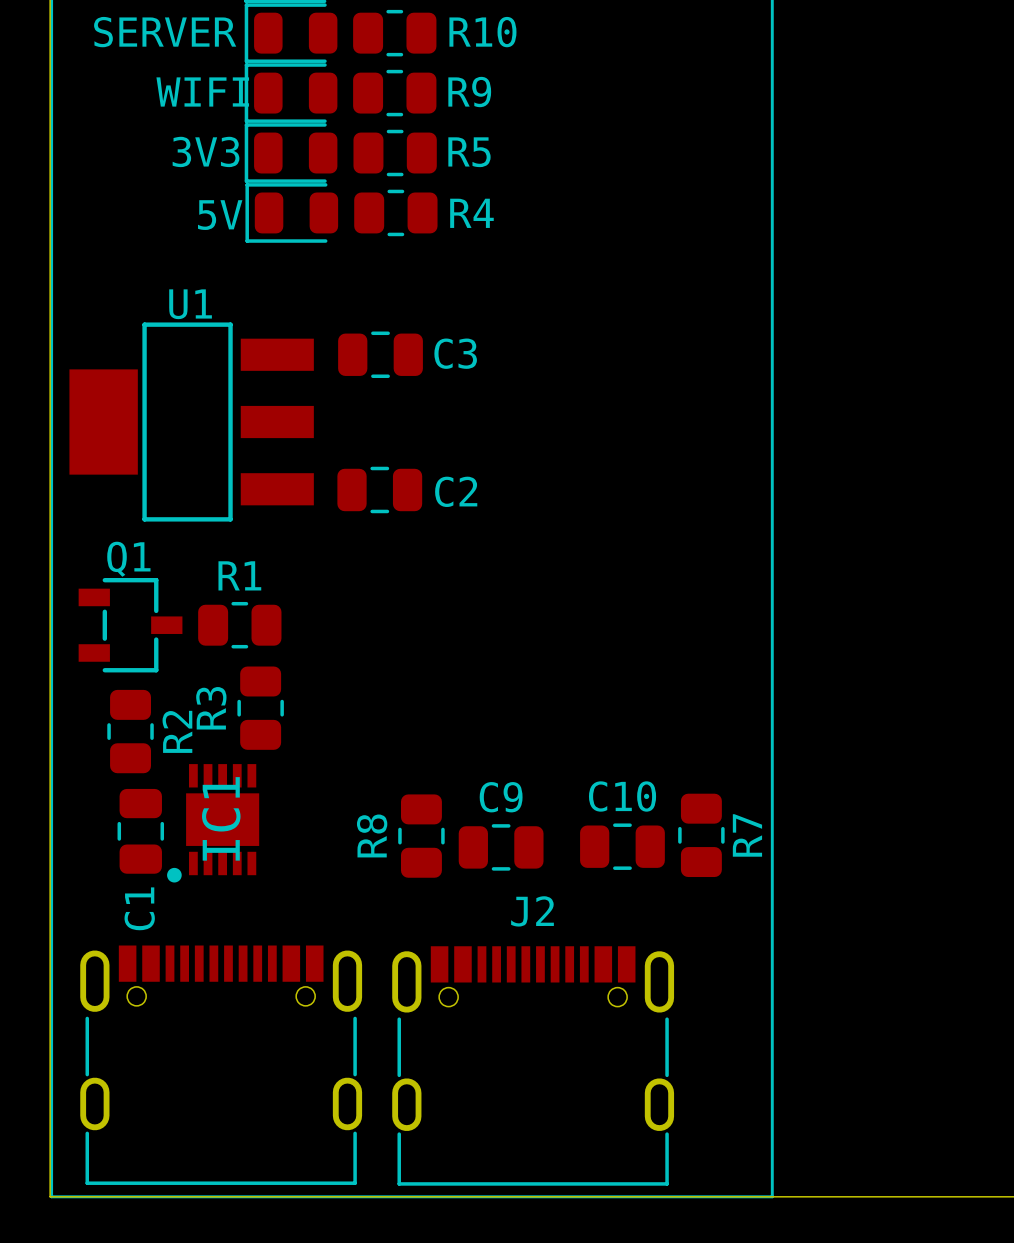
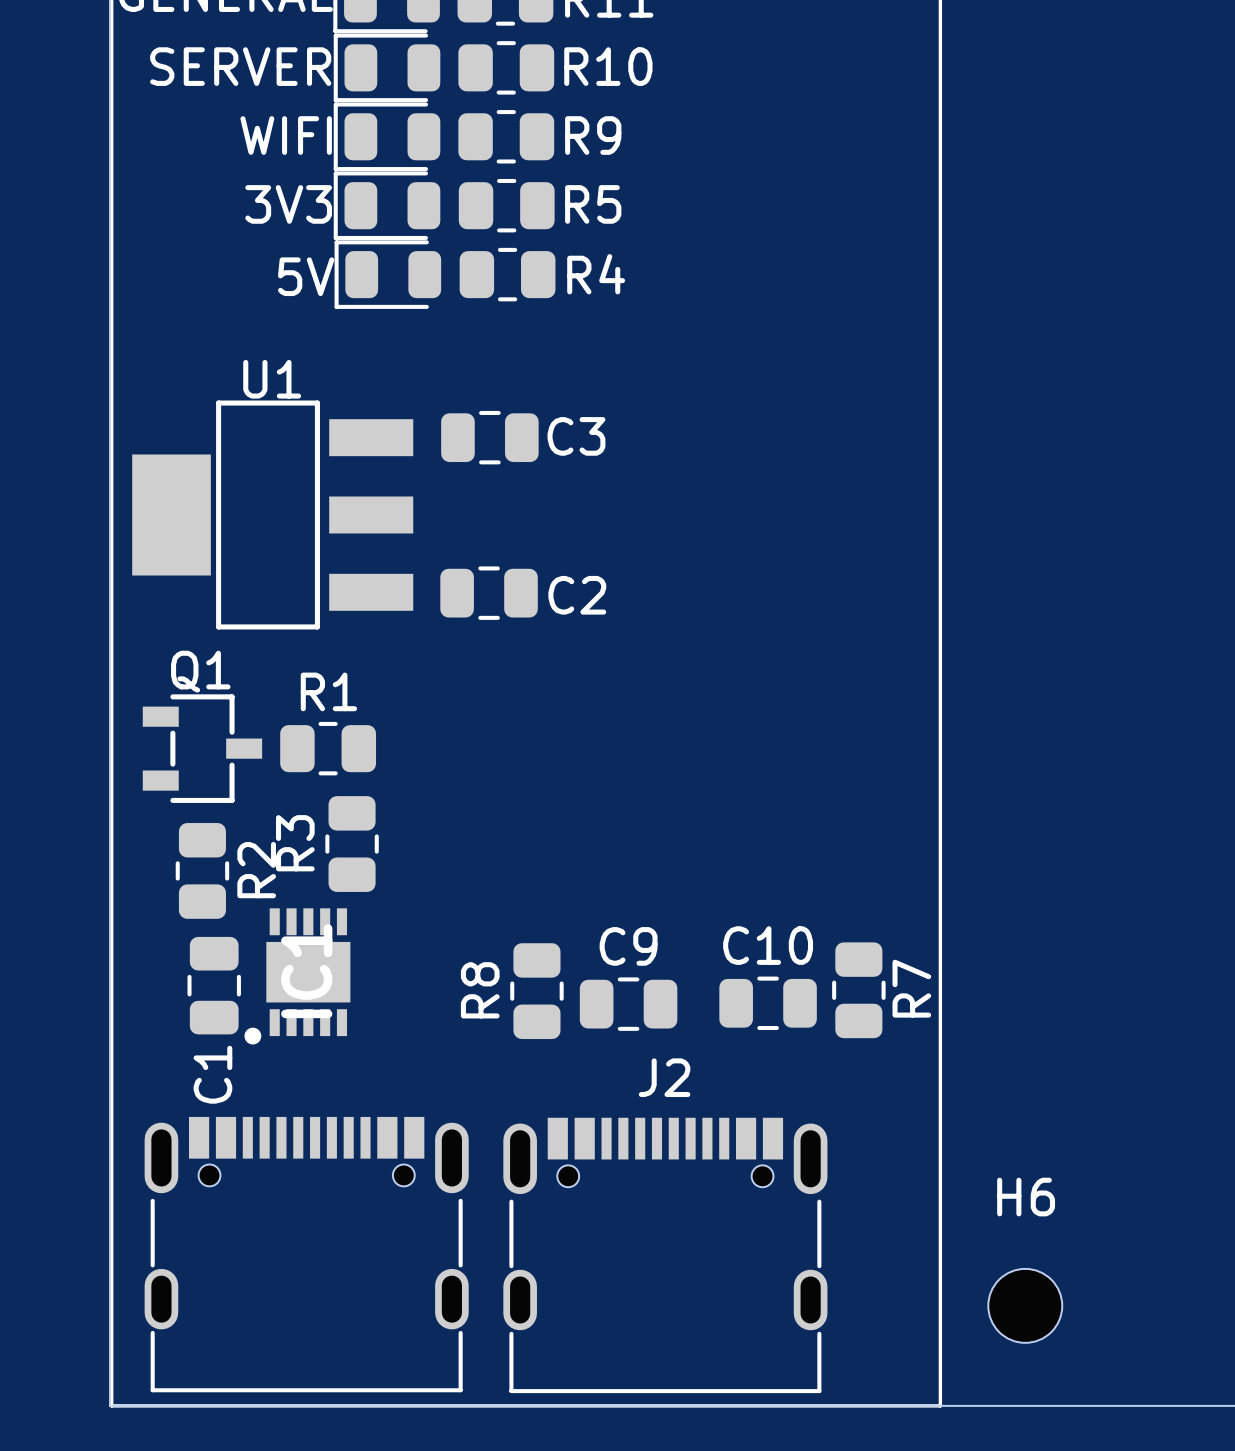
H6: none -> (1025, 1305)

